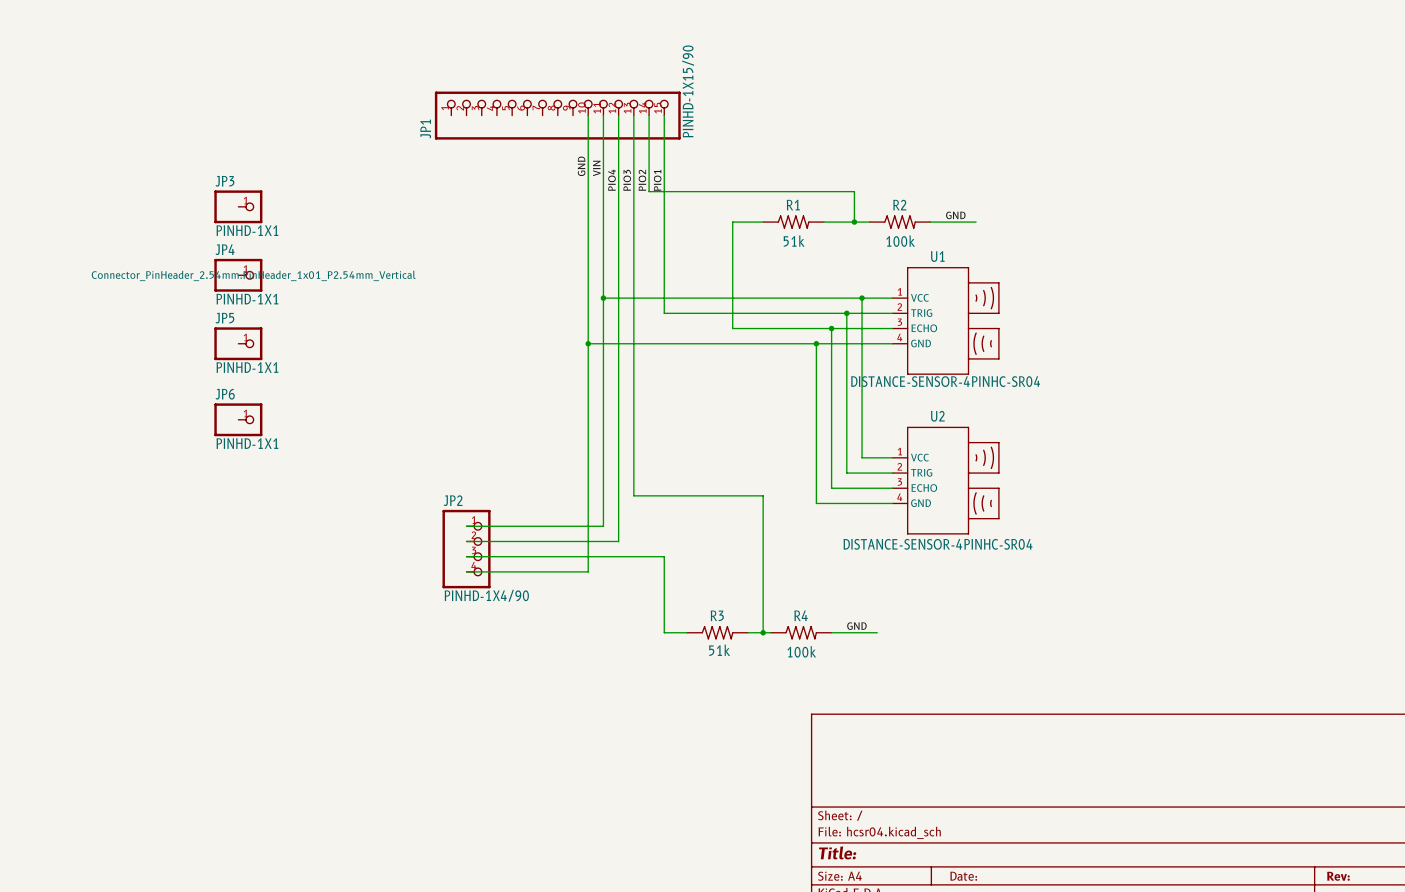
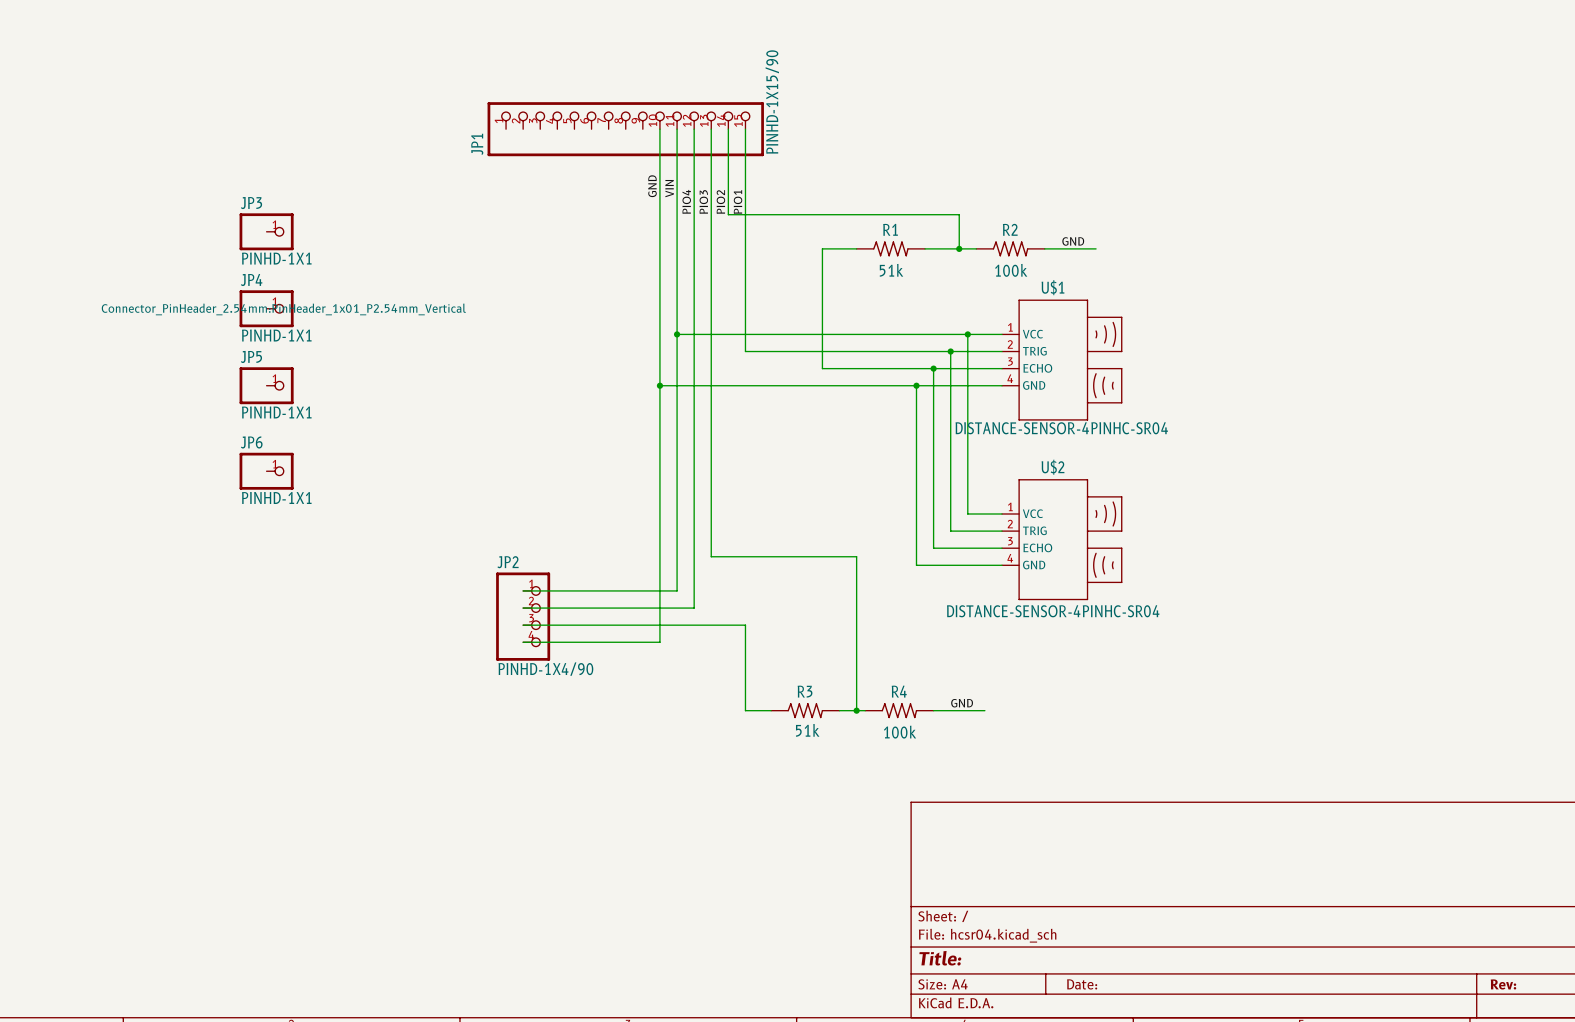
U1 name: U1 (937, 256) -> U$1 (1052, 287)
U2 name: U2 (937, 416) -> U$2 (1053, 467)

